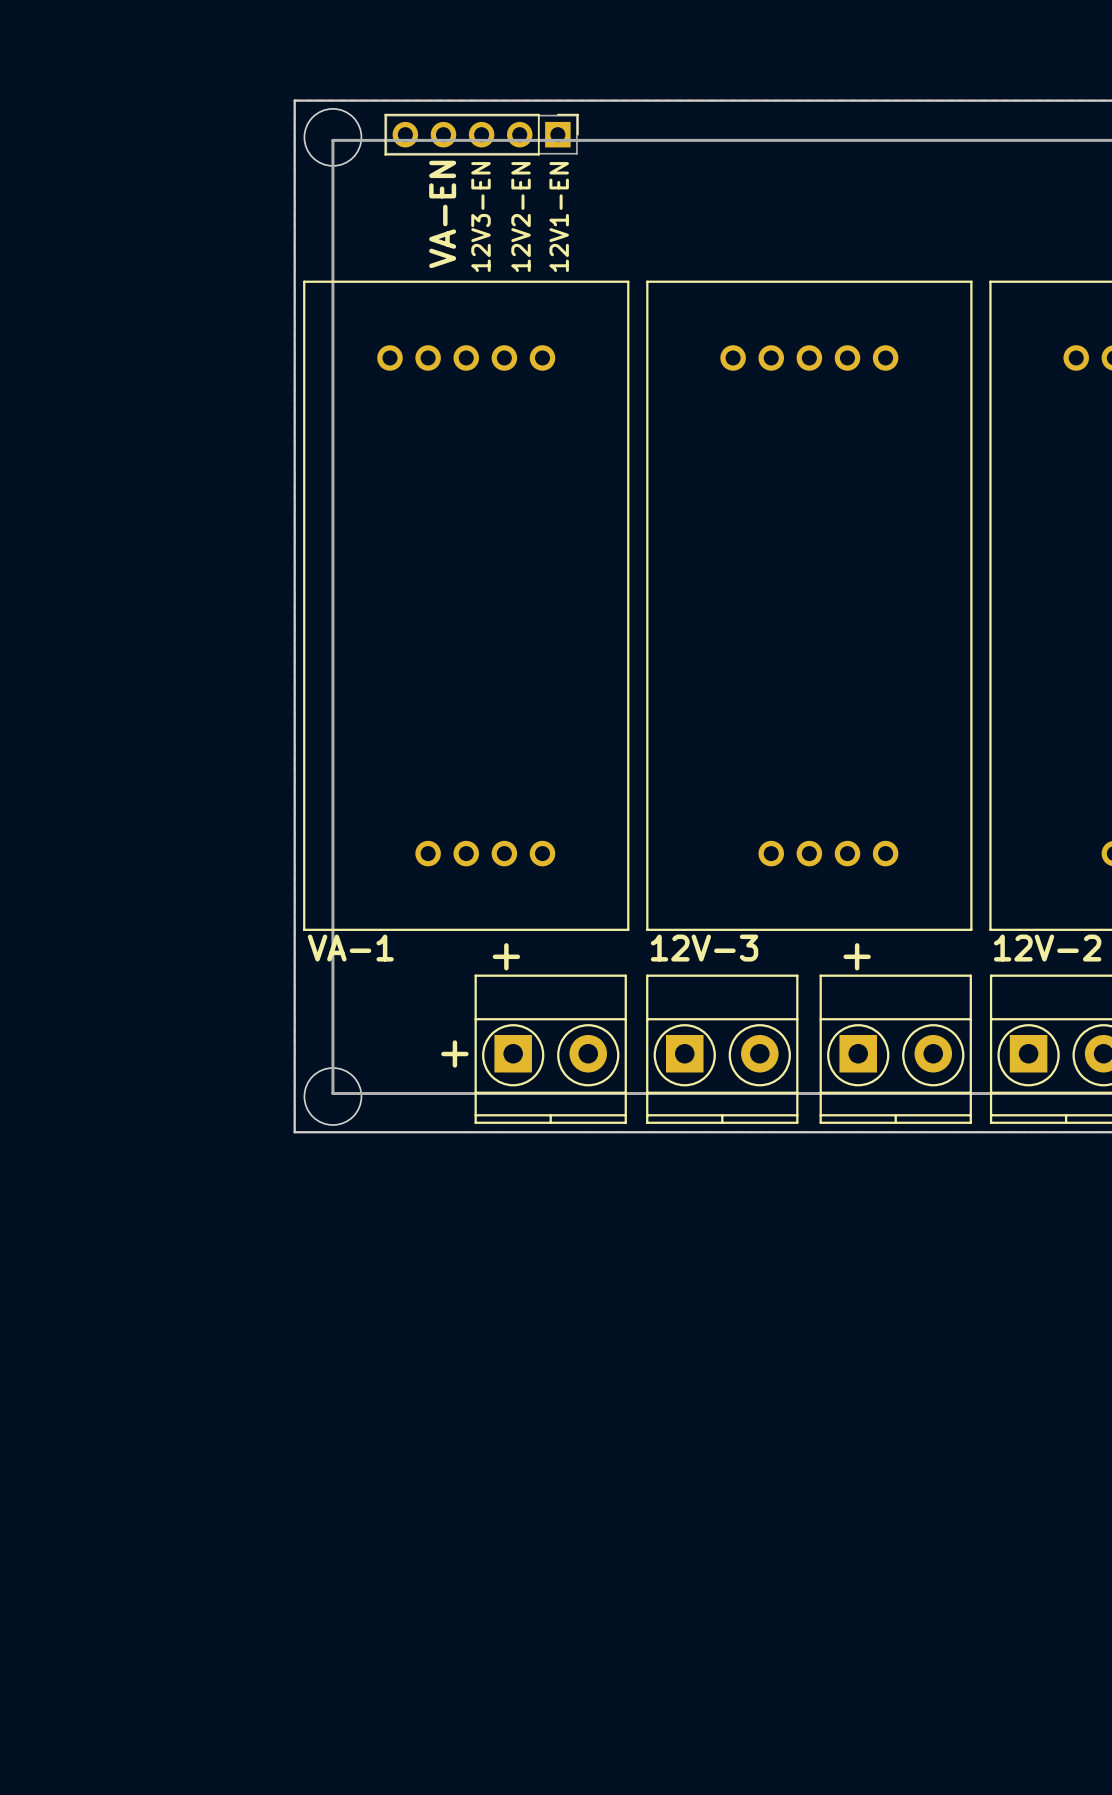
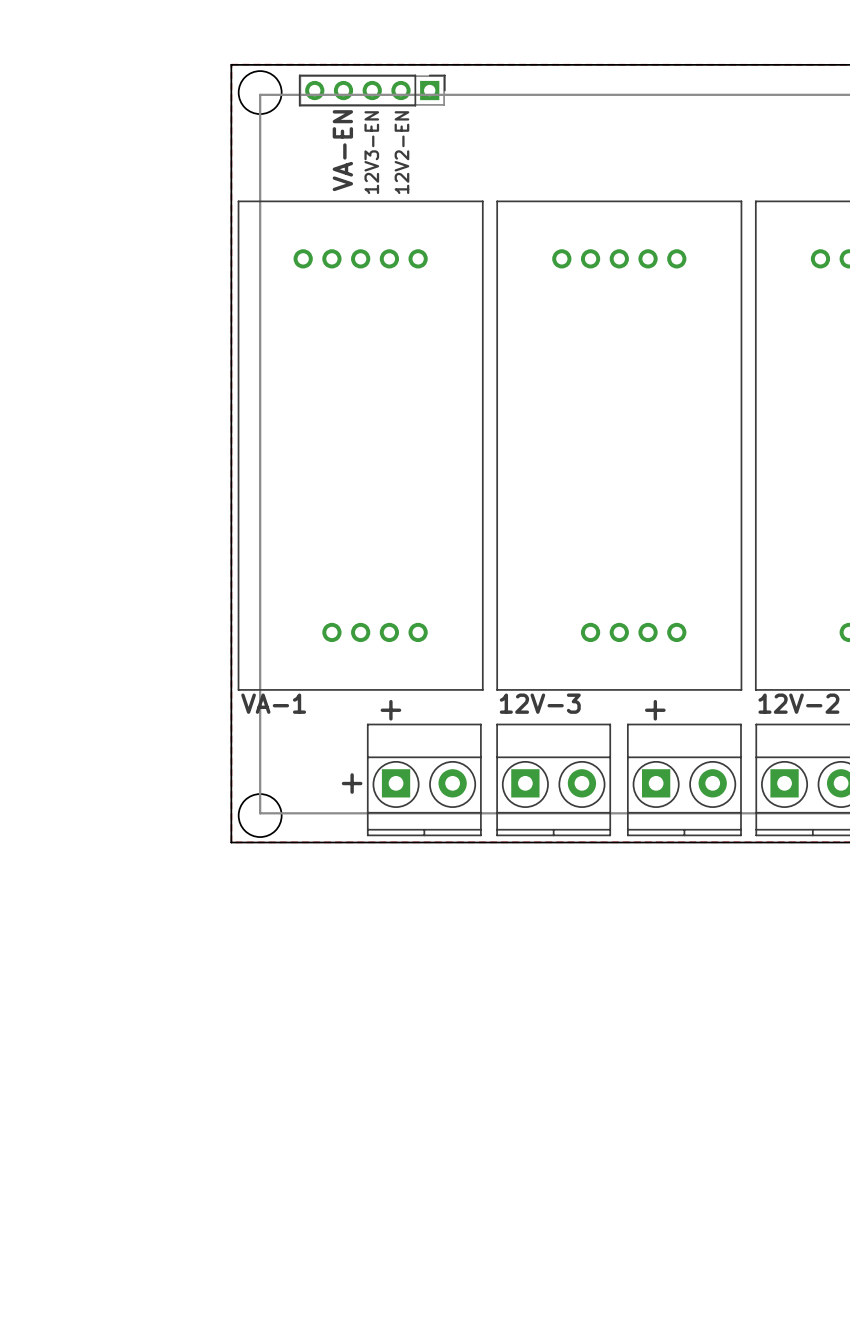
text: 12V1-EN (559, 217) -> none

